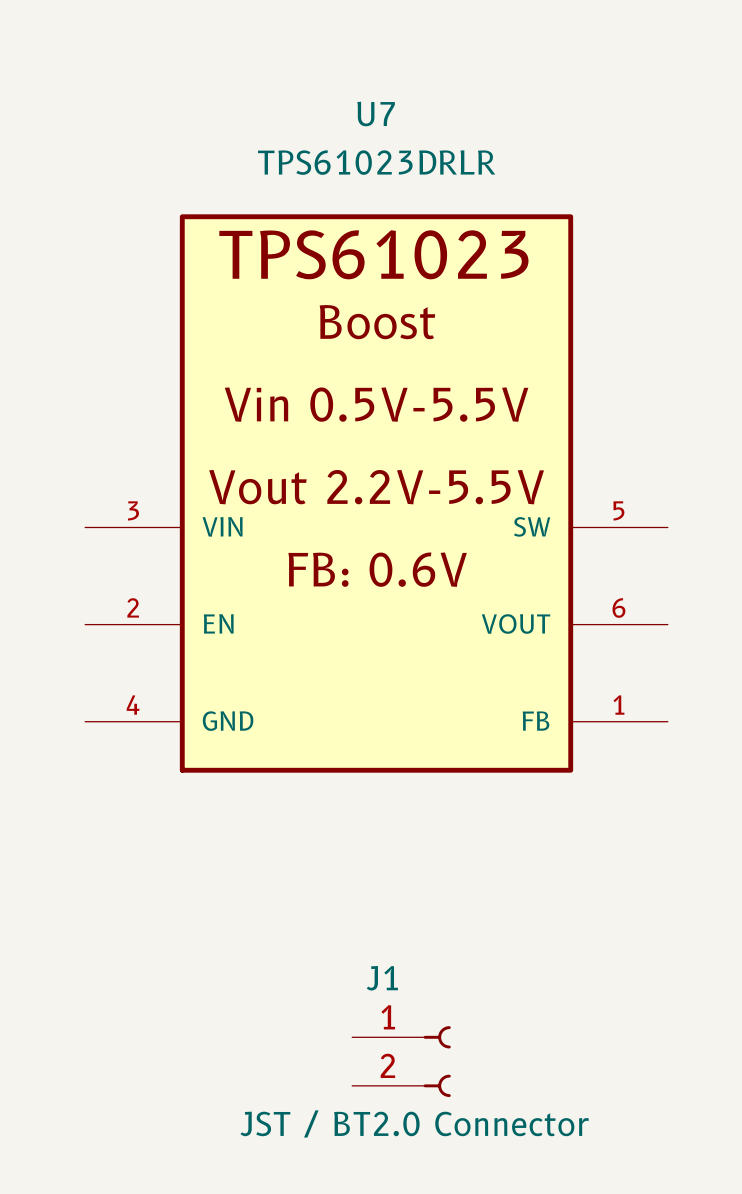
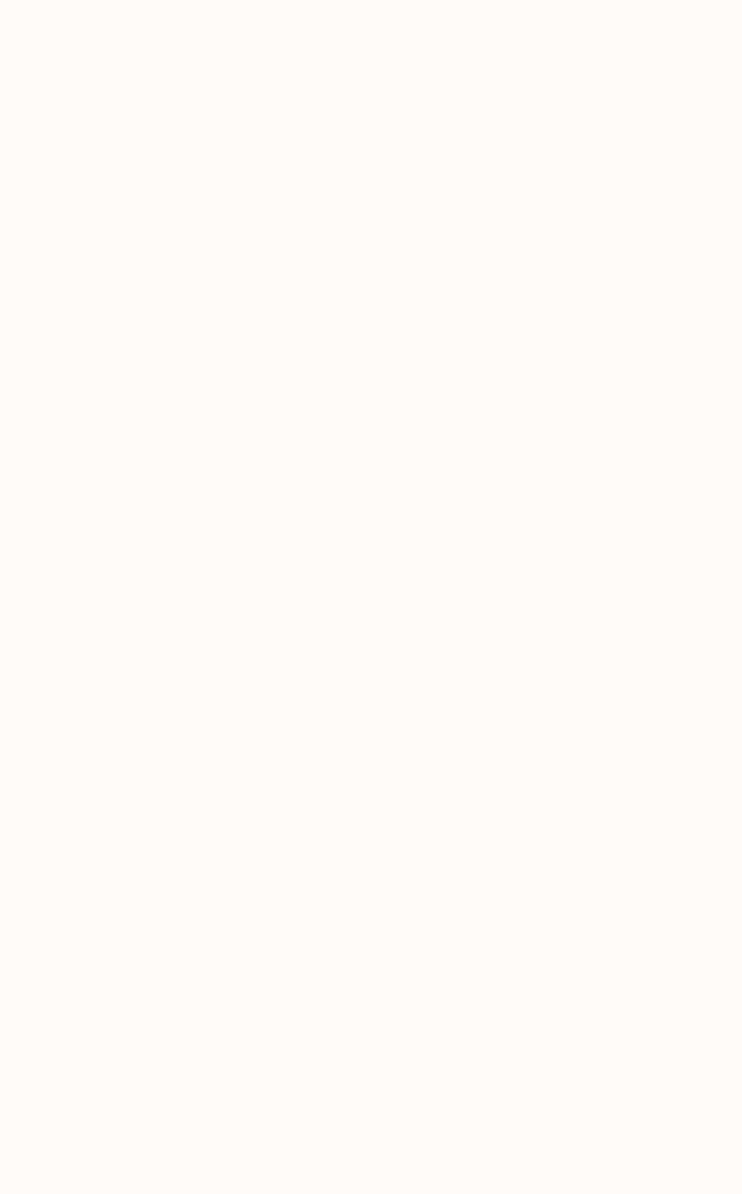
U7: TPS61023DRLR (376, 493) -> none
J1: JST / BT2.0 Connector (401, 1061) -> none

